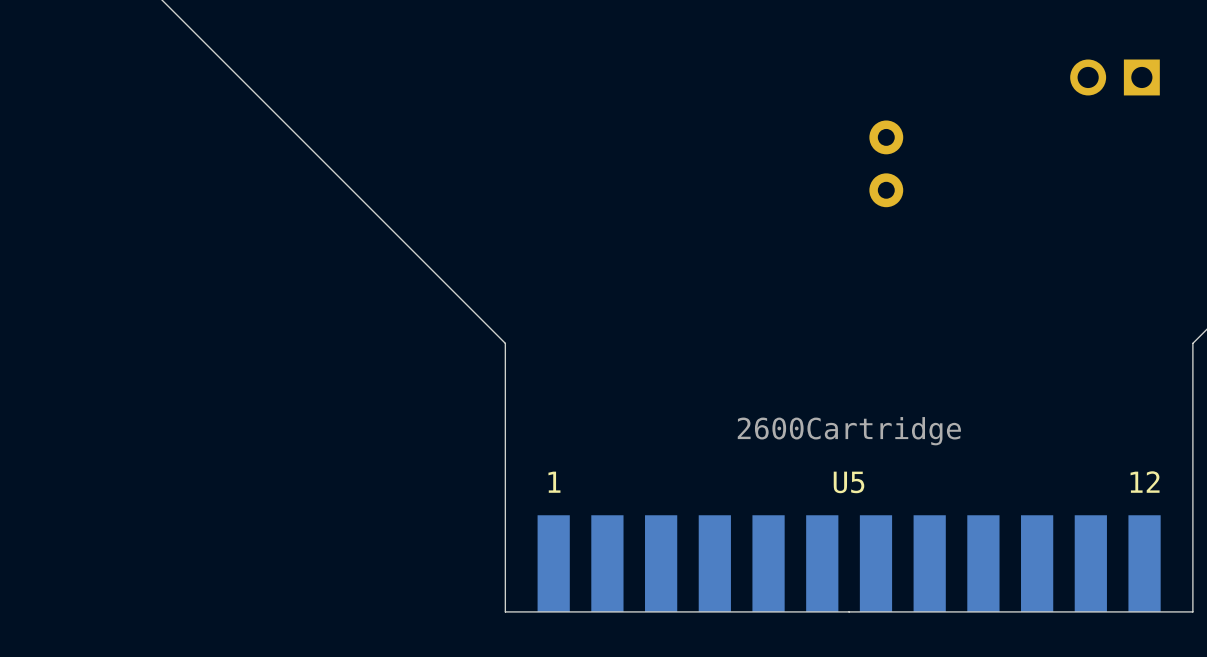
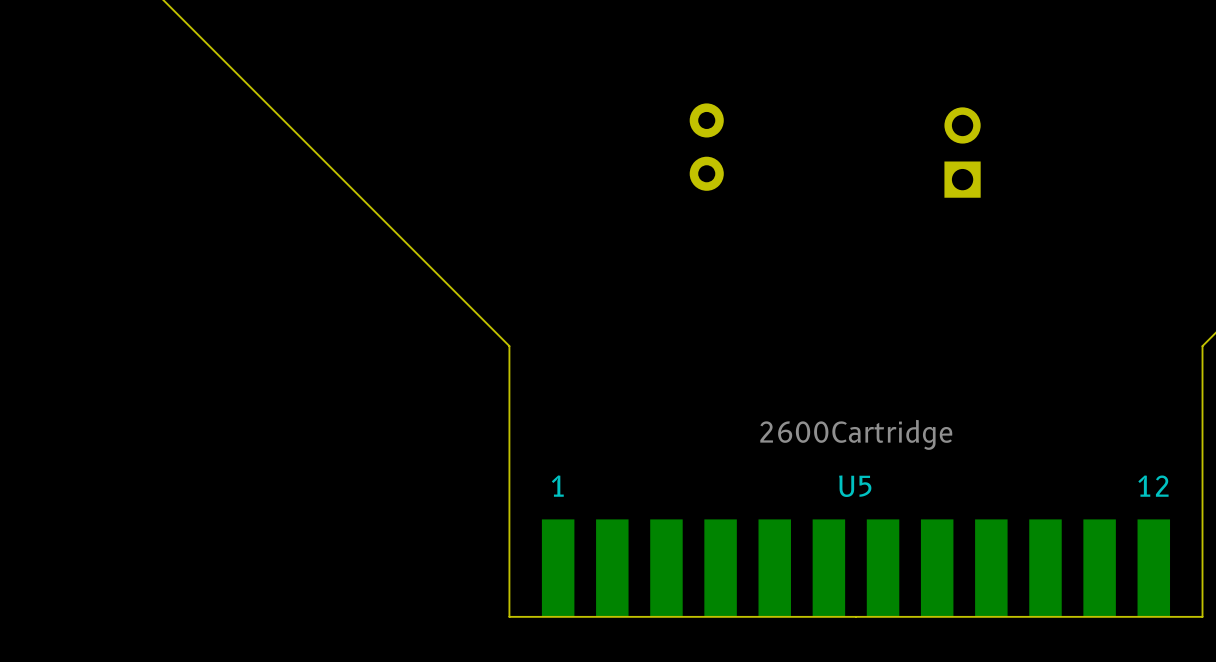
part rotation: 0° (1115, 77) -> 90° clockwise (962, 152)
part position: (1115, 77) -> (962, 152)
part position: (886, 163) -> (706, 147)

